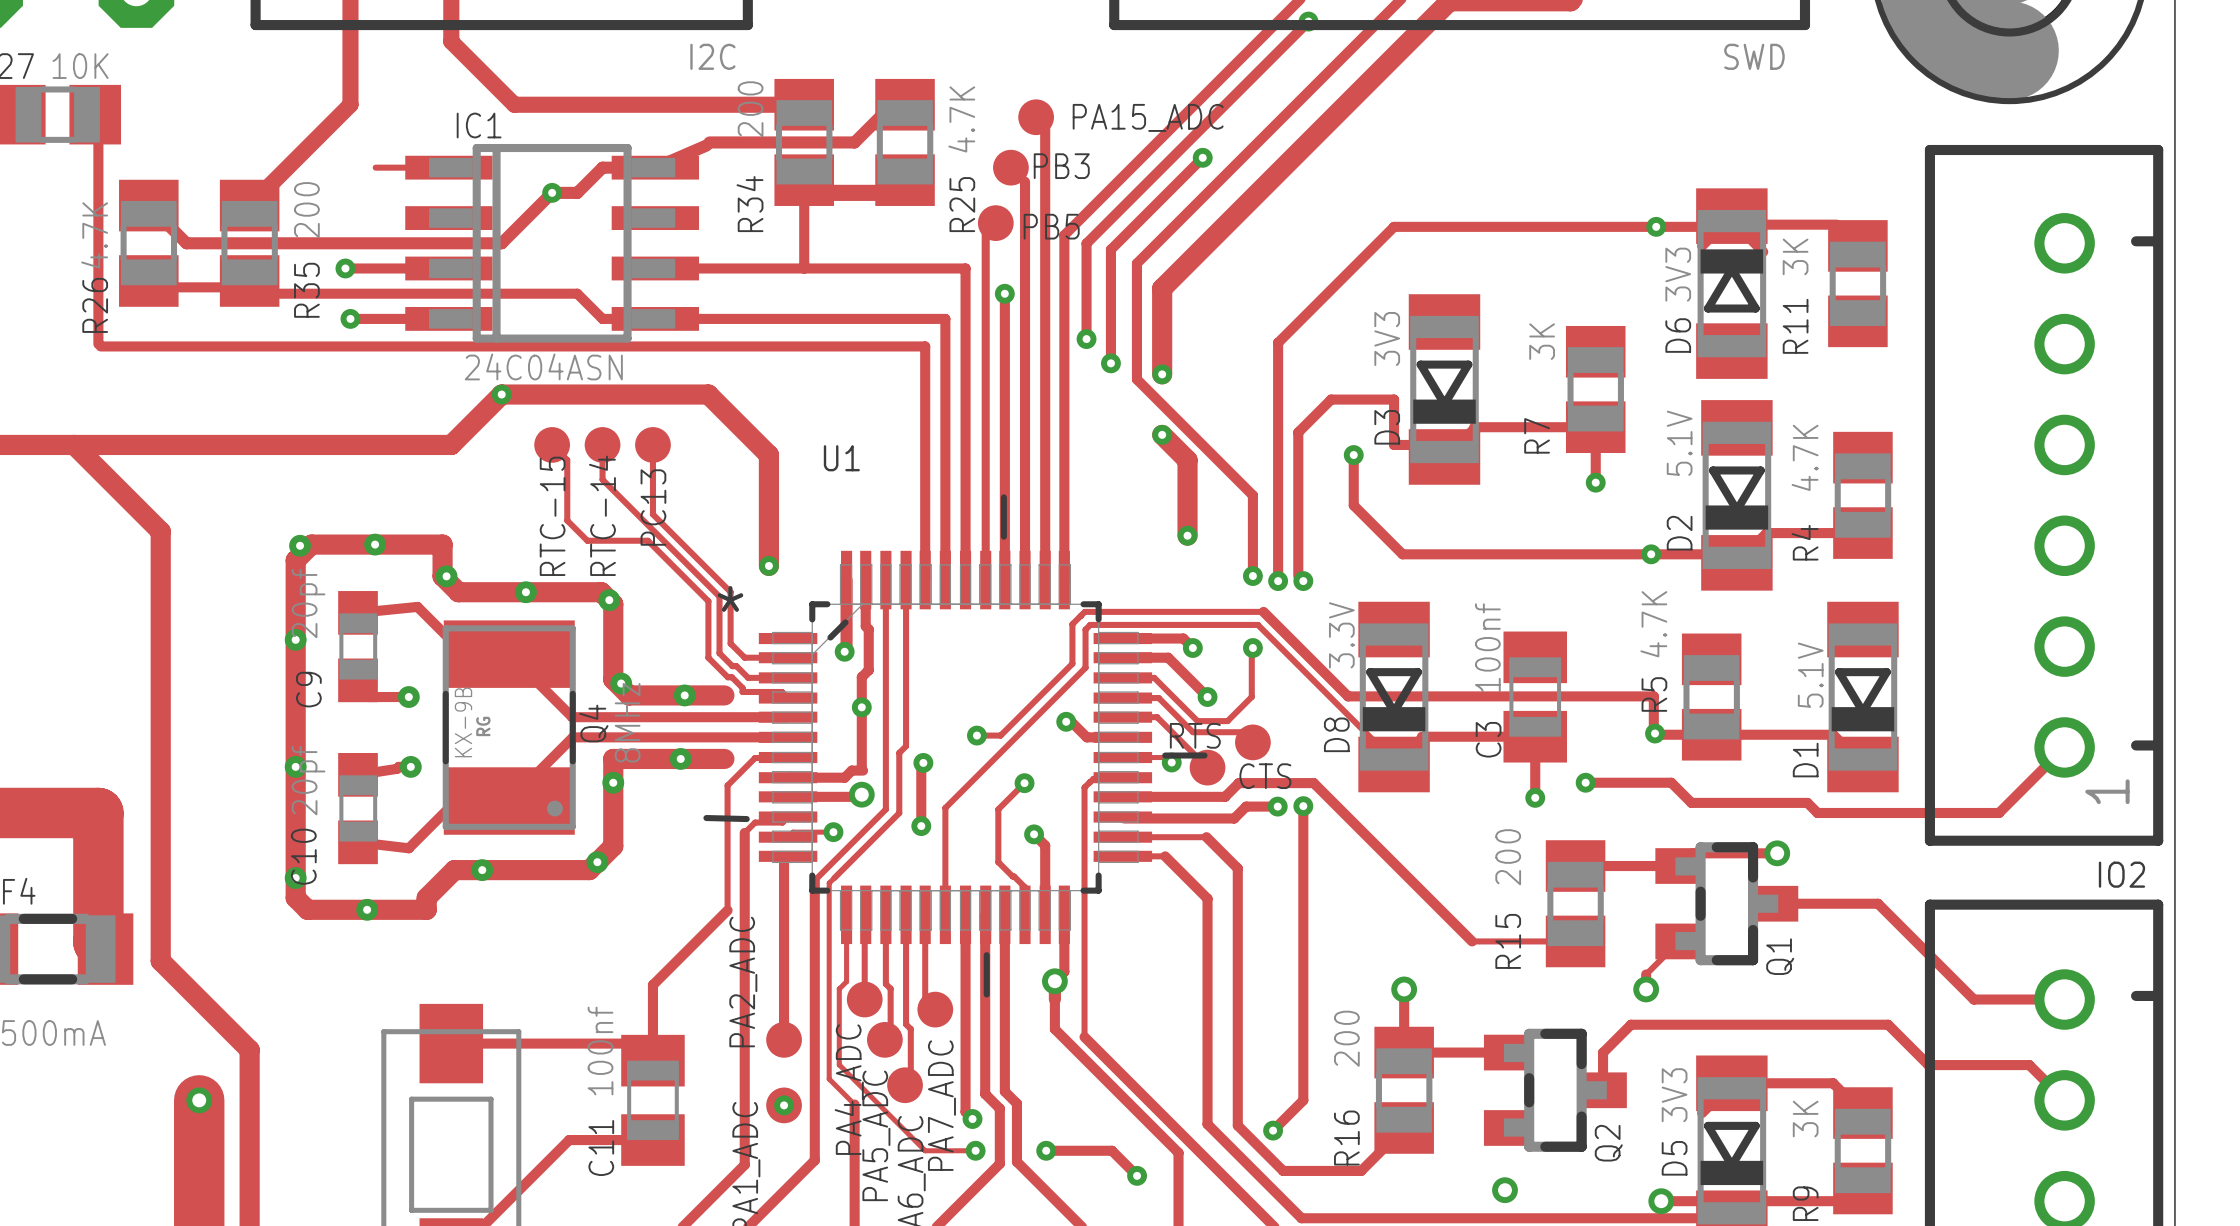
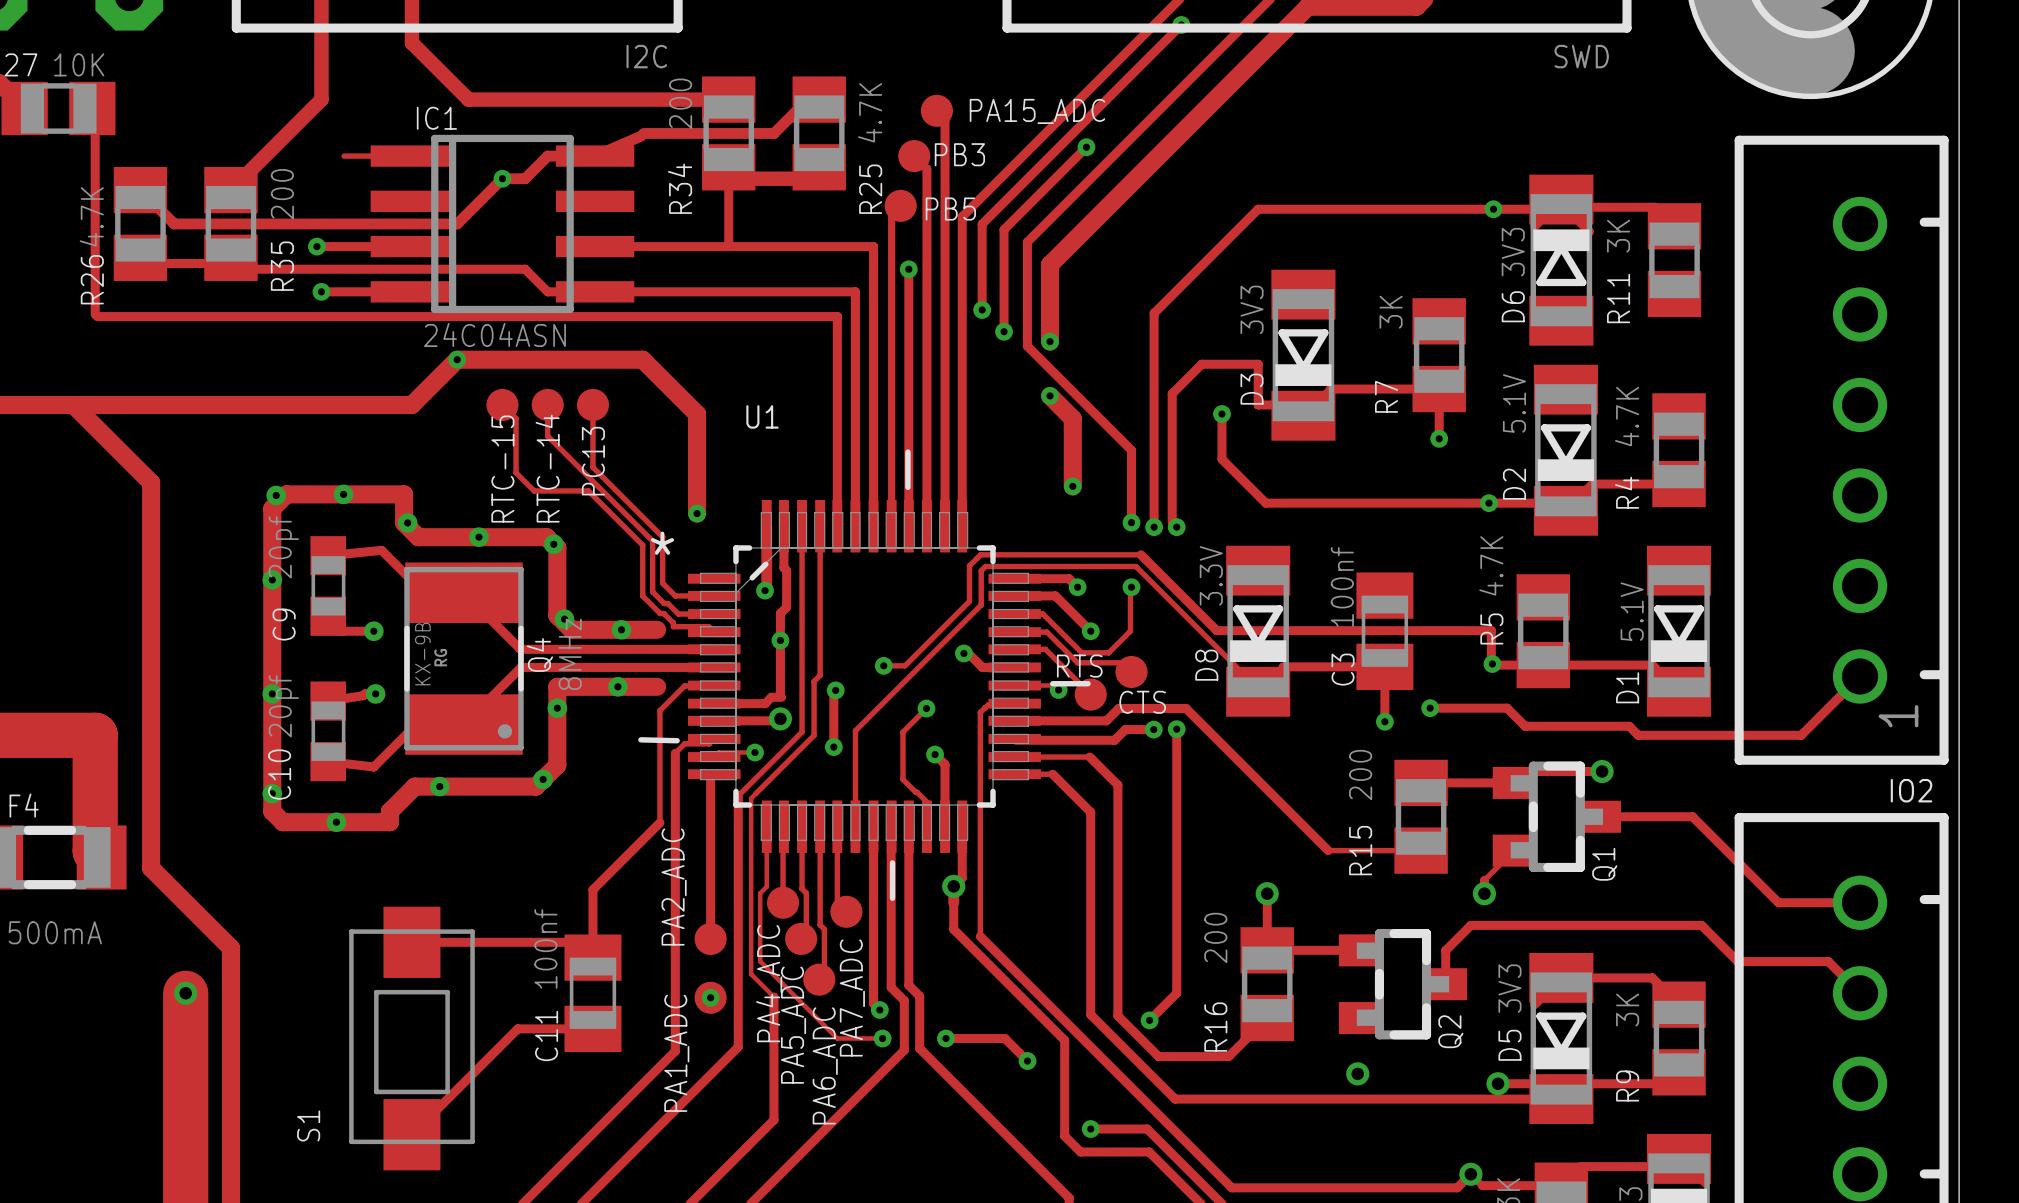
IC1 footprint: [405, 143, 700, 343] -> [370, 134, 635, 314]

